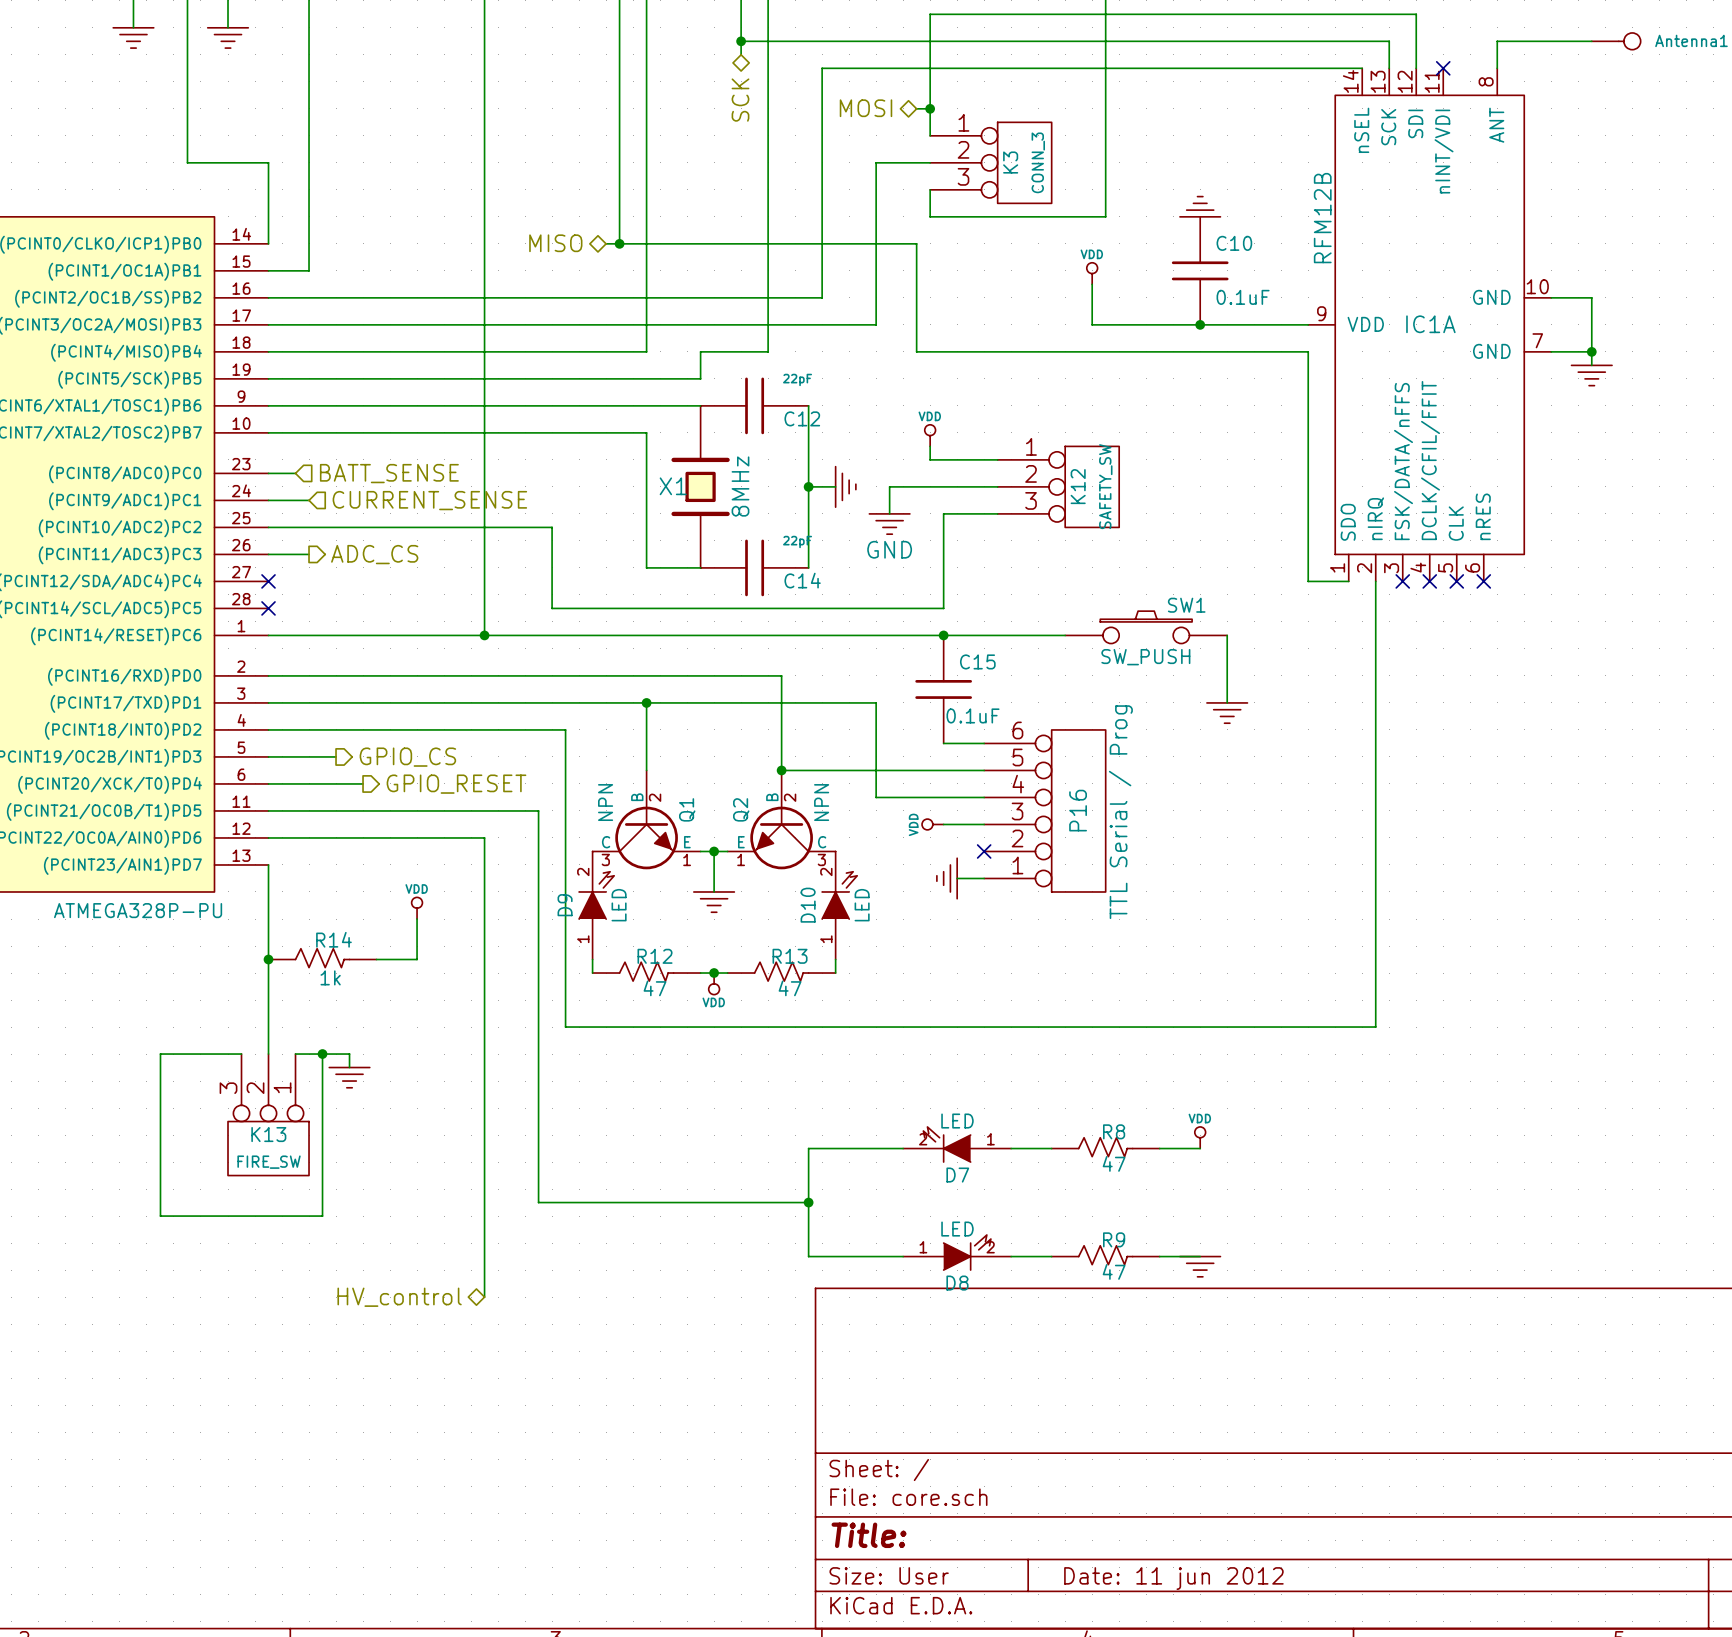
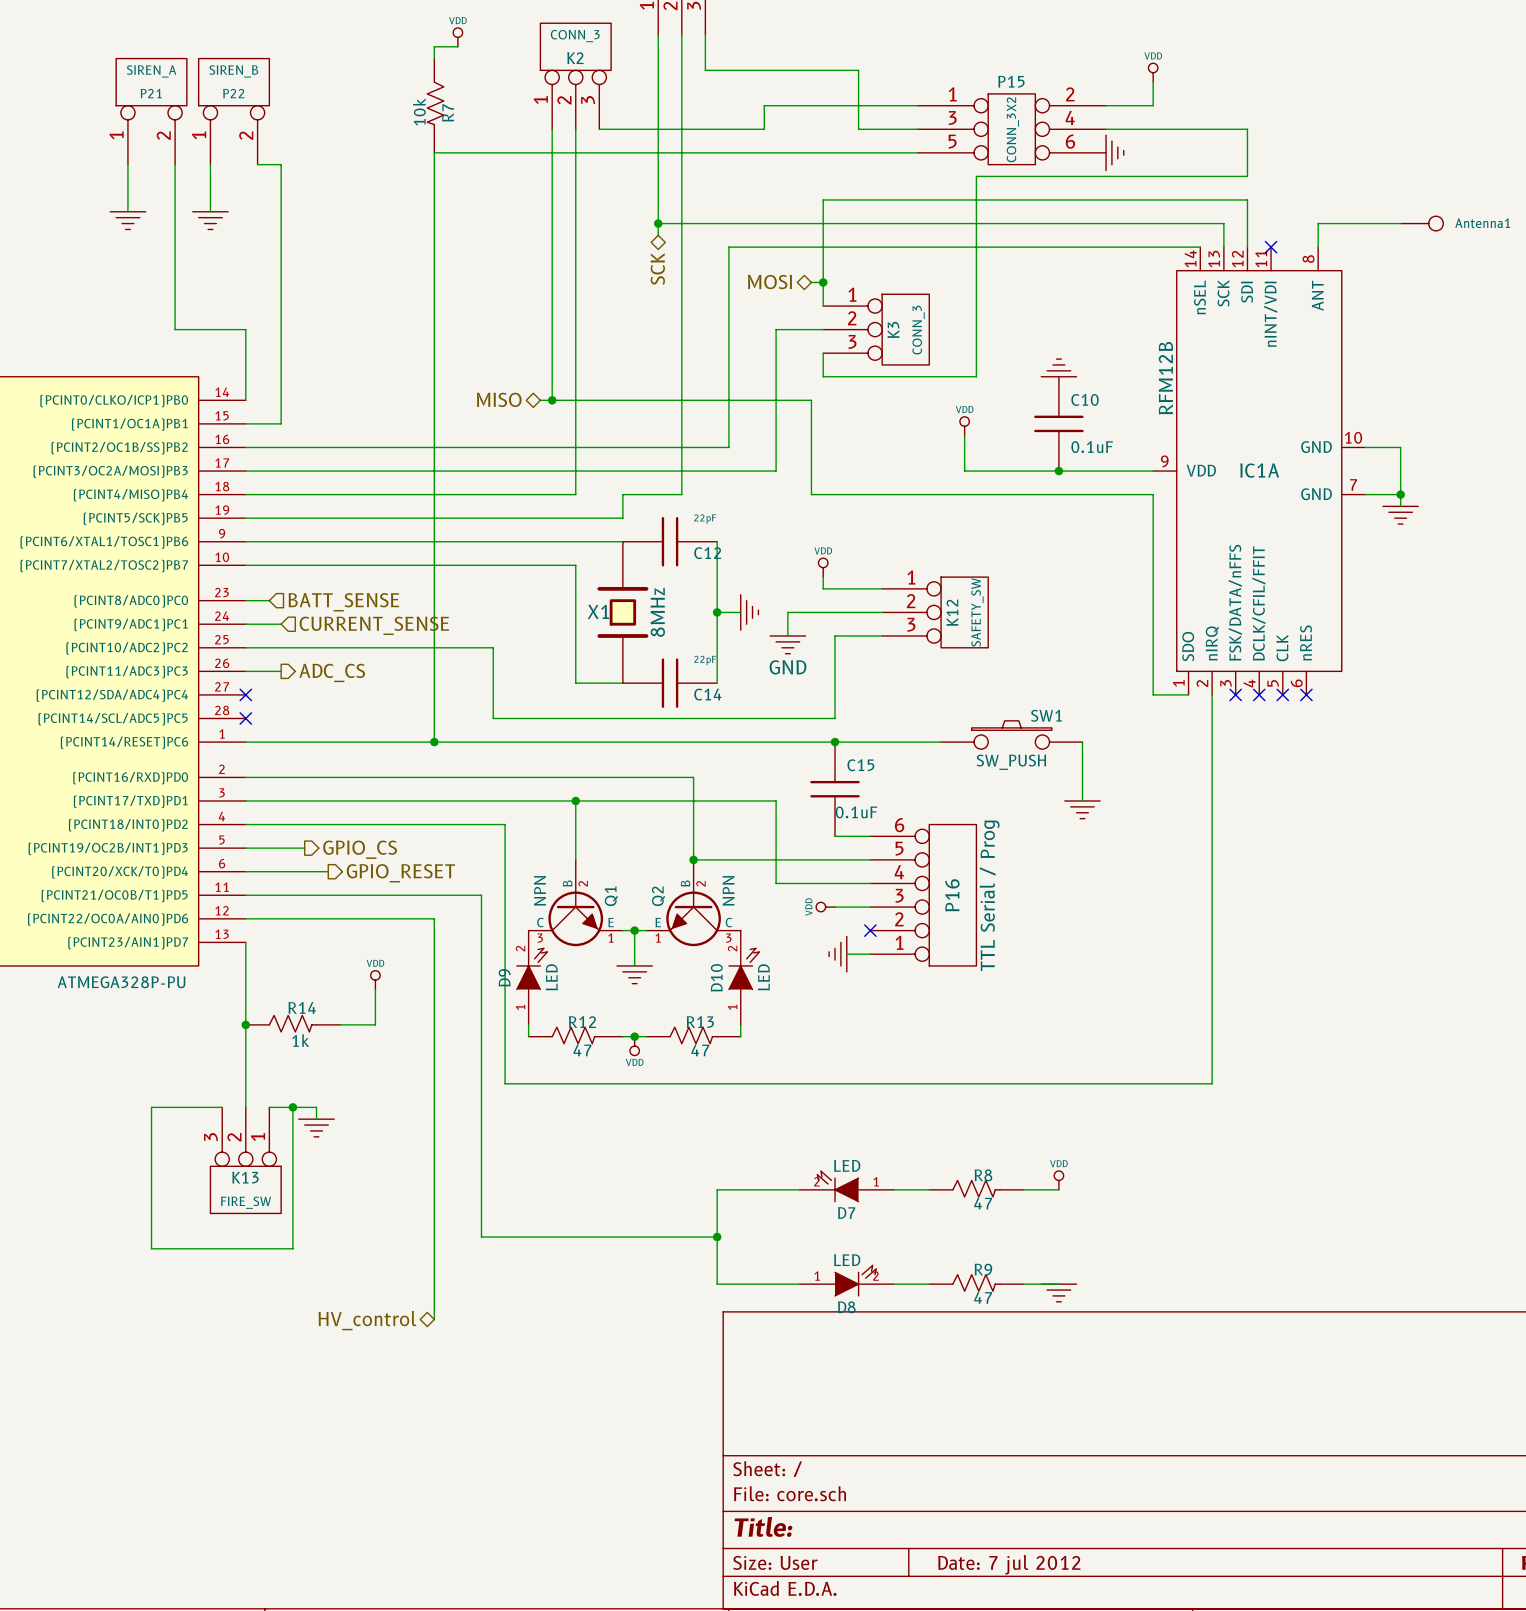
title block: Date: 11 jun 2012 (1173, 1578) -> Date: 7 jul 2012 (1009, 1564)

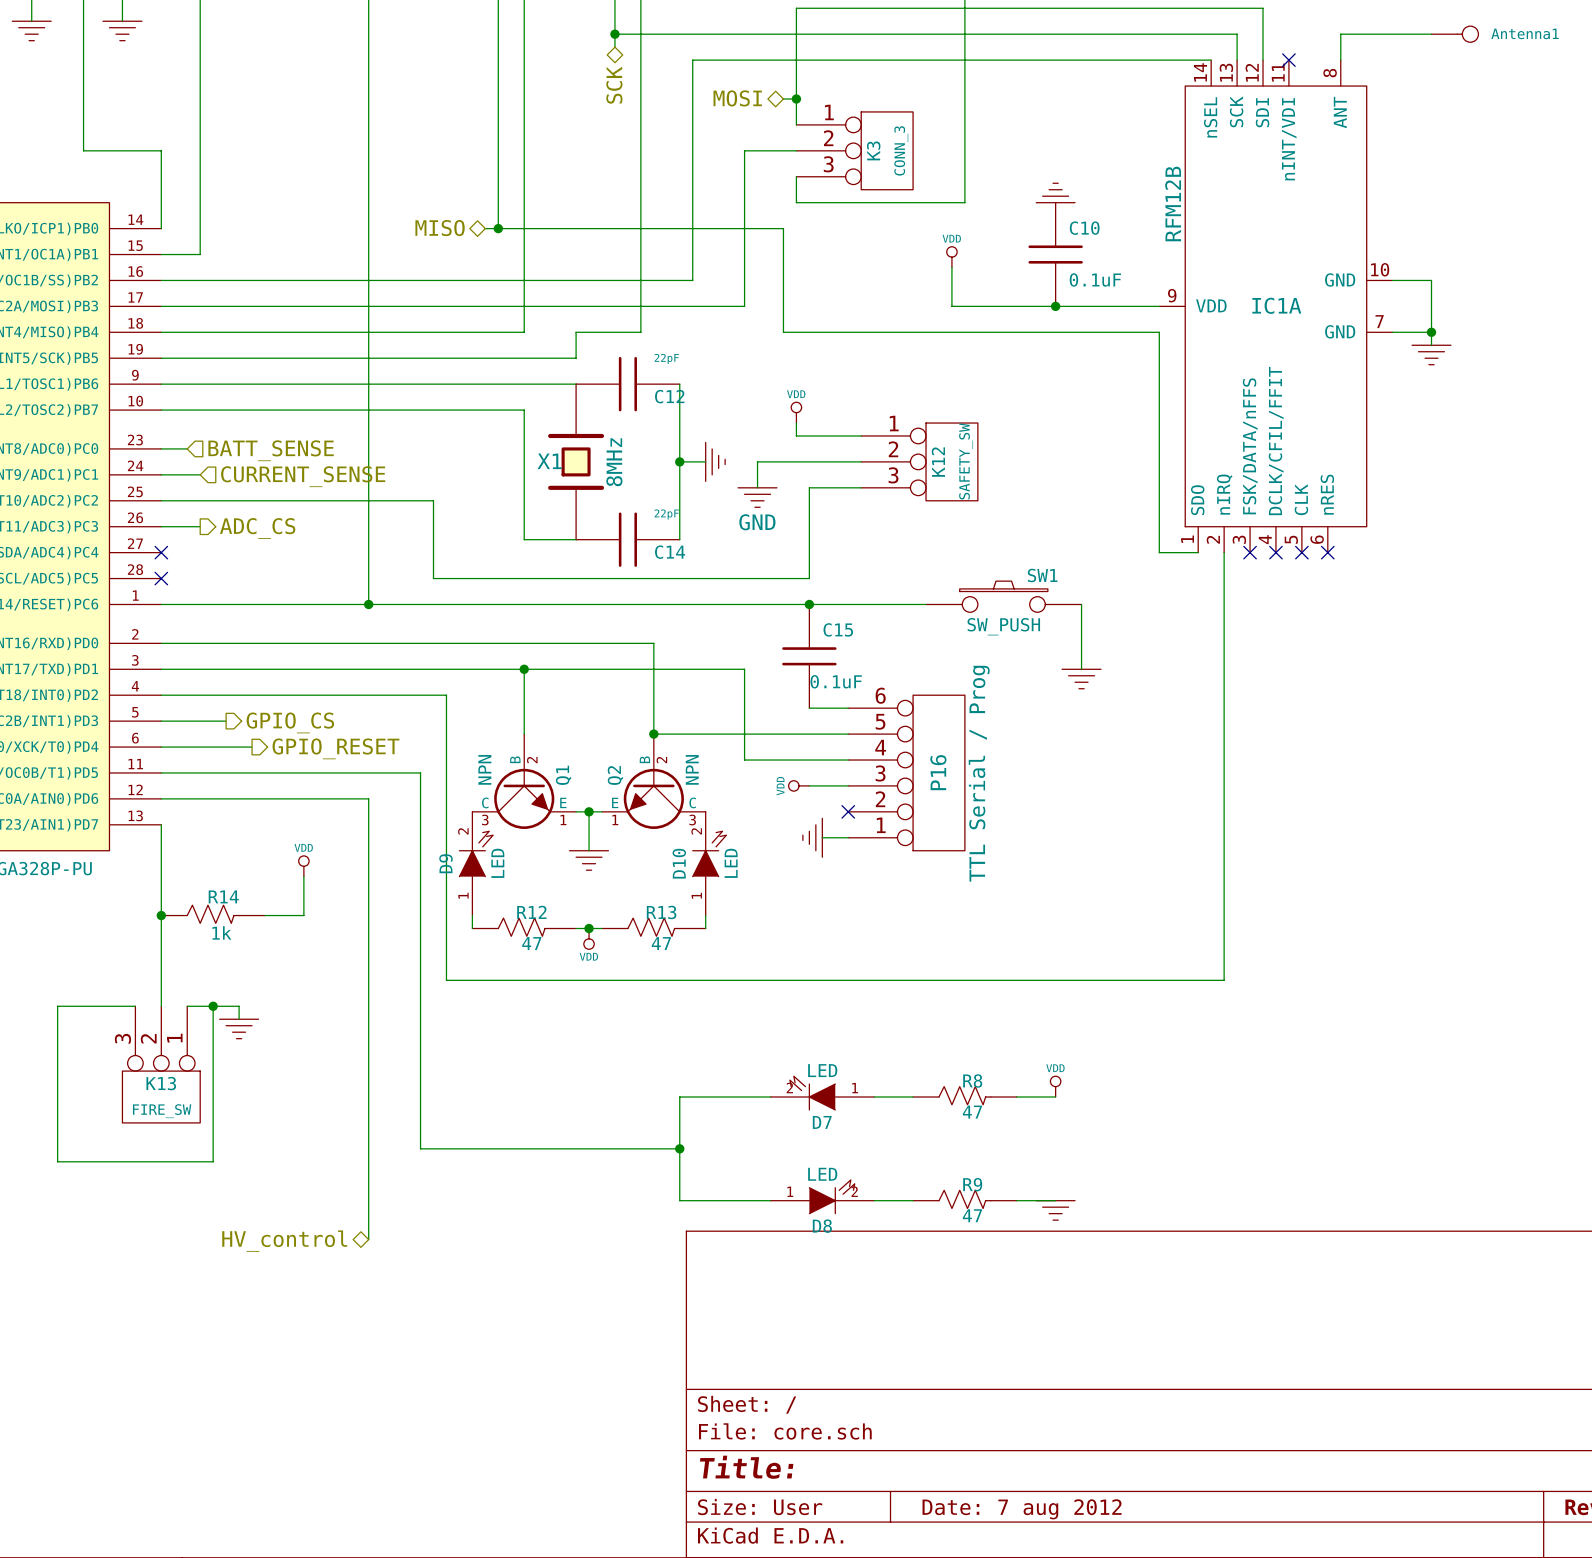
title block: Date: 7 jul 2012 (1009, 1564) -> Date: 7 aug 2012 (1022, 1509)

